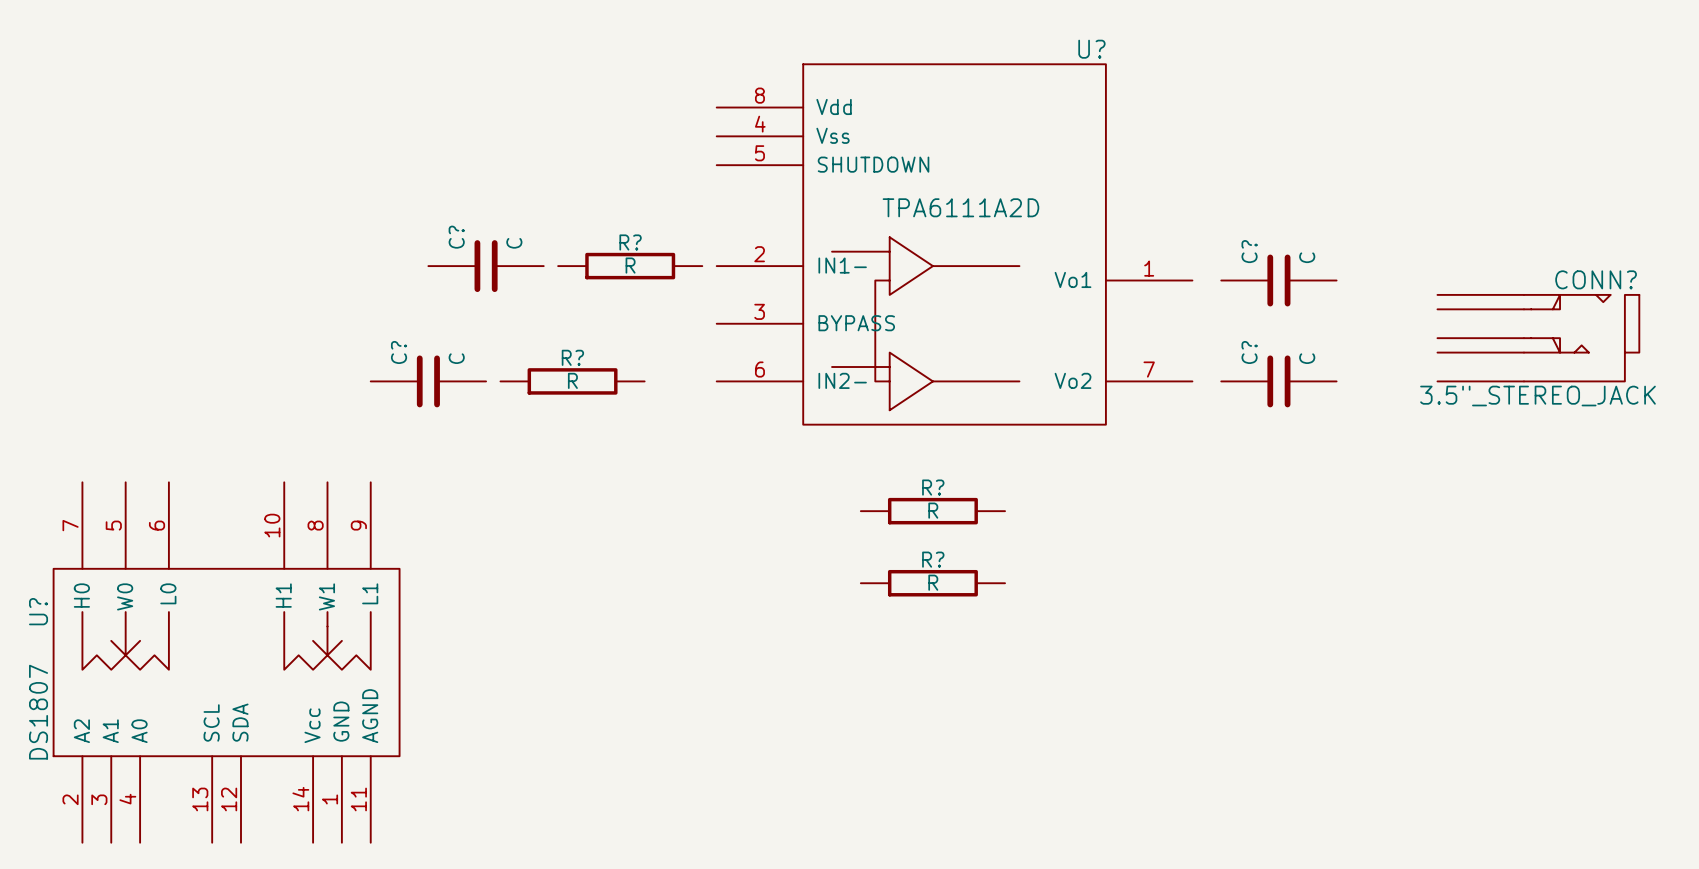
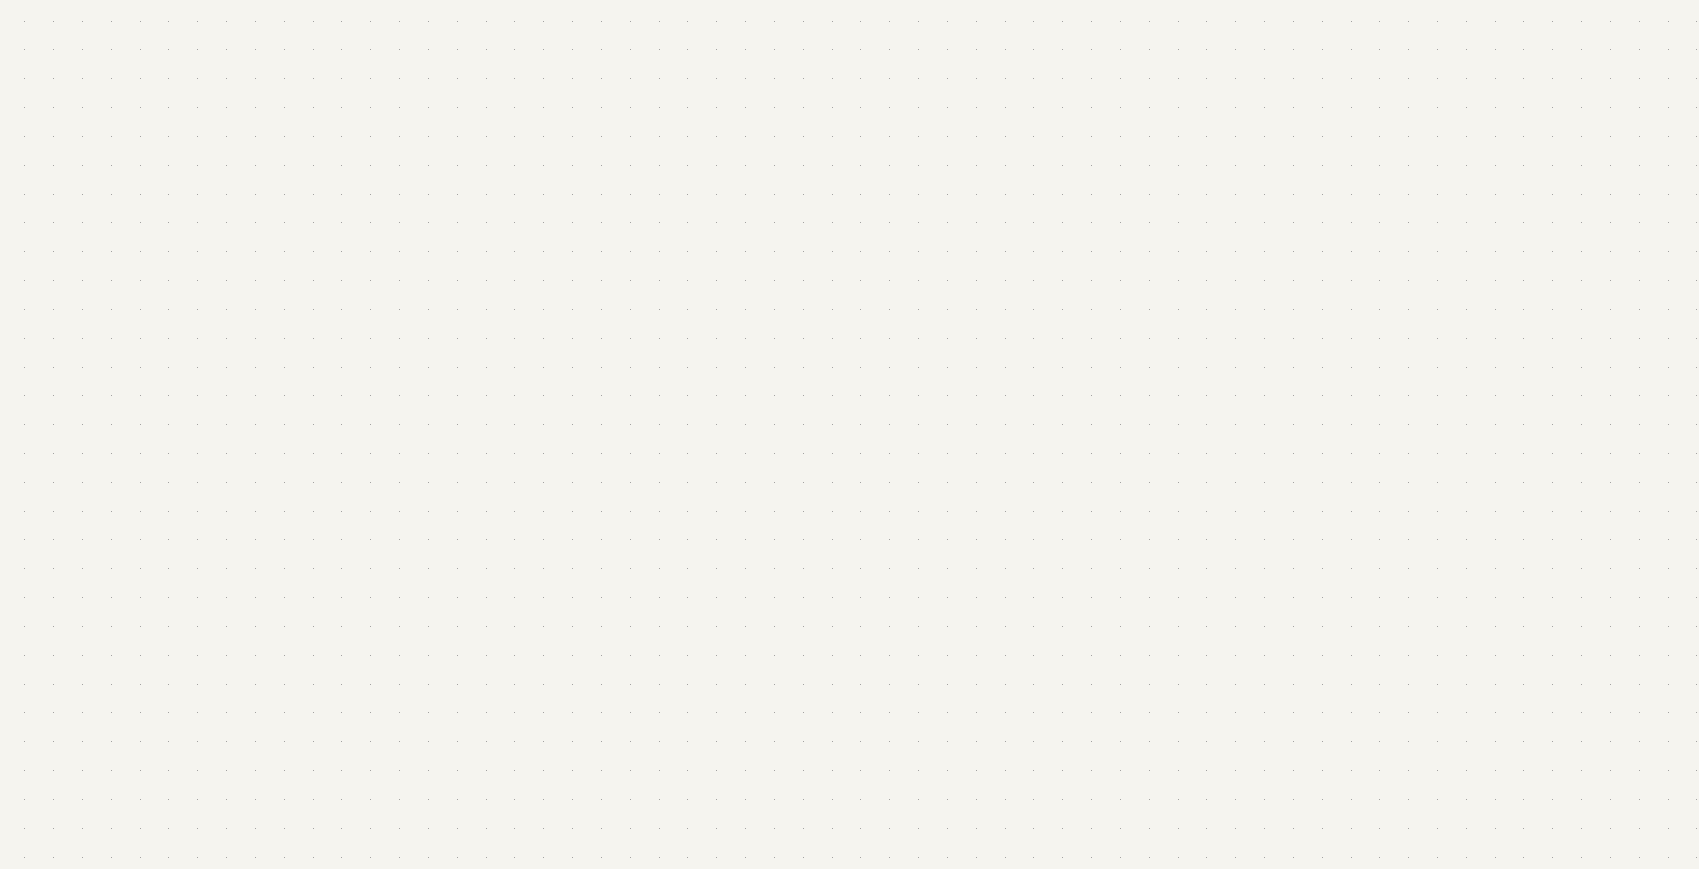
U?: TPA6111A2D (954, 244) -> none
C?: C (486, 266) -> none
R?: R (630, 266) -> none
C?: C (1278, 280) -> none
CONN?: 3.5"_STEREO_JACK (1538, 338) -> none
C?: C (428, 381) -> none
R?: R (572, 381) -> none
C?: C (1278, 381) -> none
R?: R (932, 511) -> none
R?: R (932, 583) -> none
U?: DS1807 (226, 662) -> none

